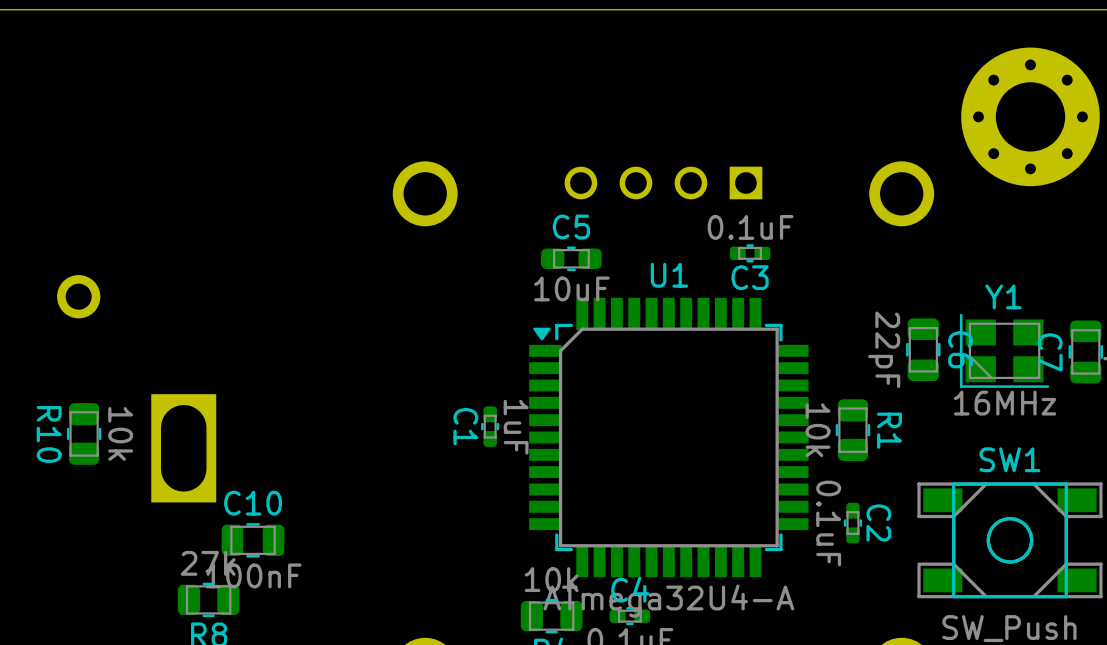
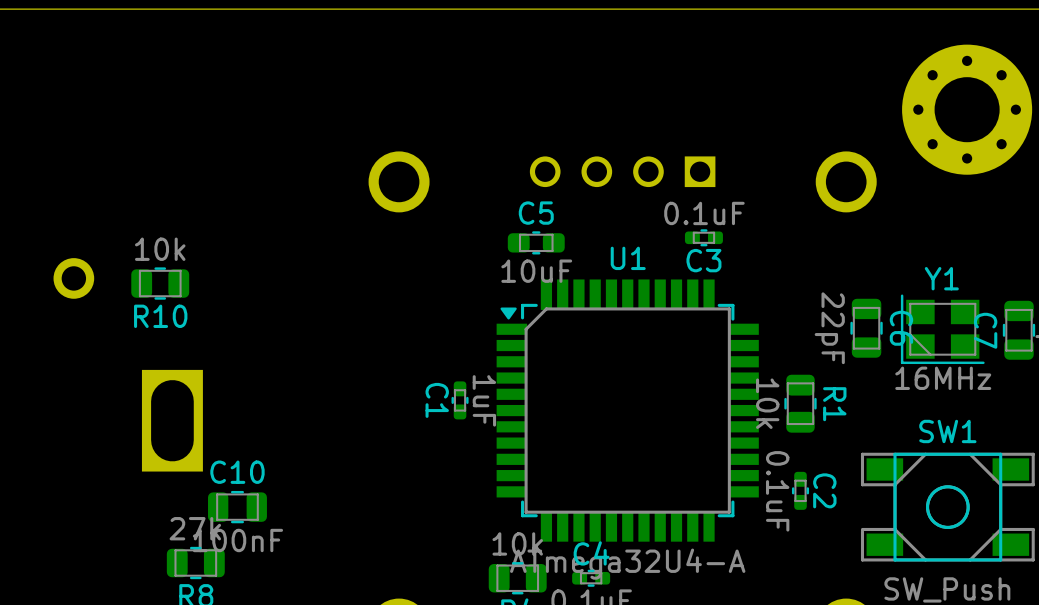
R10 rotation: 0° (84, 433) -> 90° clockwise (160, 283)
R10 position: (84, 433) -> (160, 283)
R10 value position: 10k (120, 433) -> 10k (160, 249)
R10 name position: R10 (49, 434) -> R10 (160, 316)

